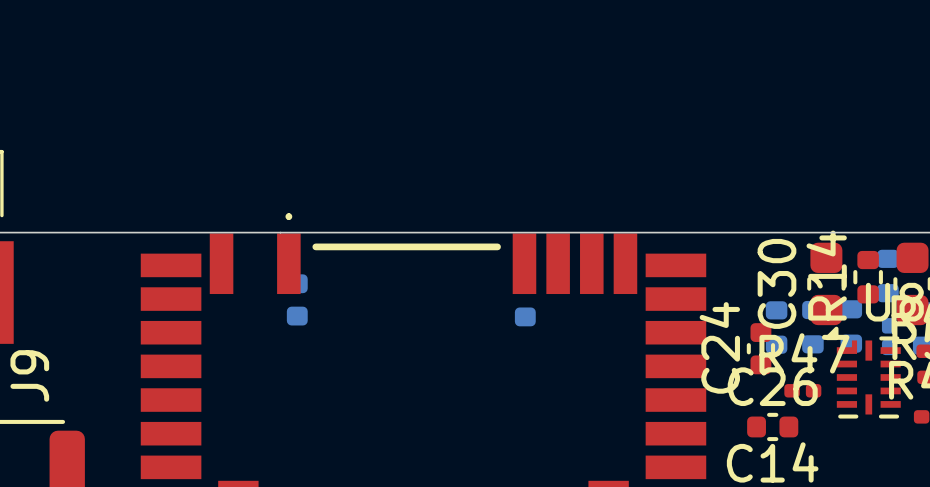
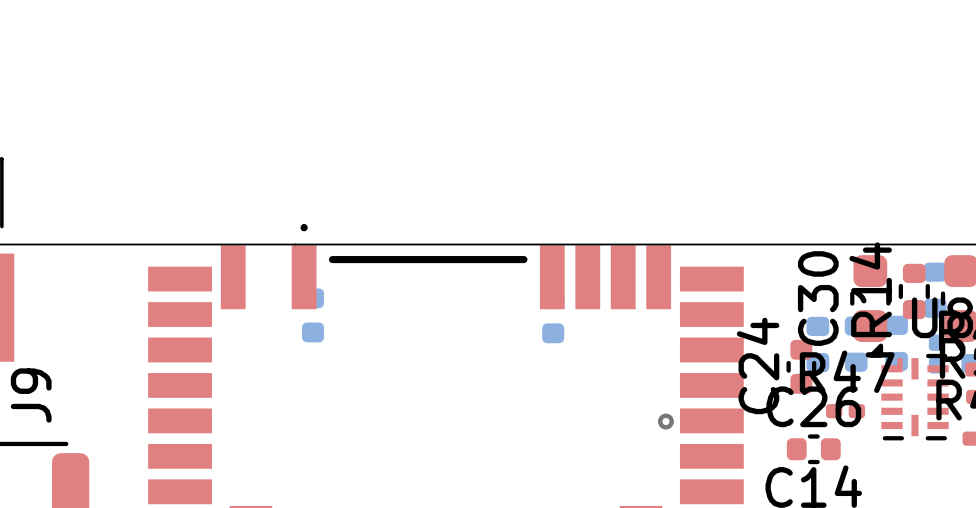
via: none -> (665, 421)

